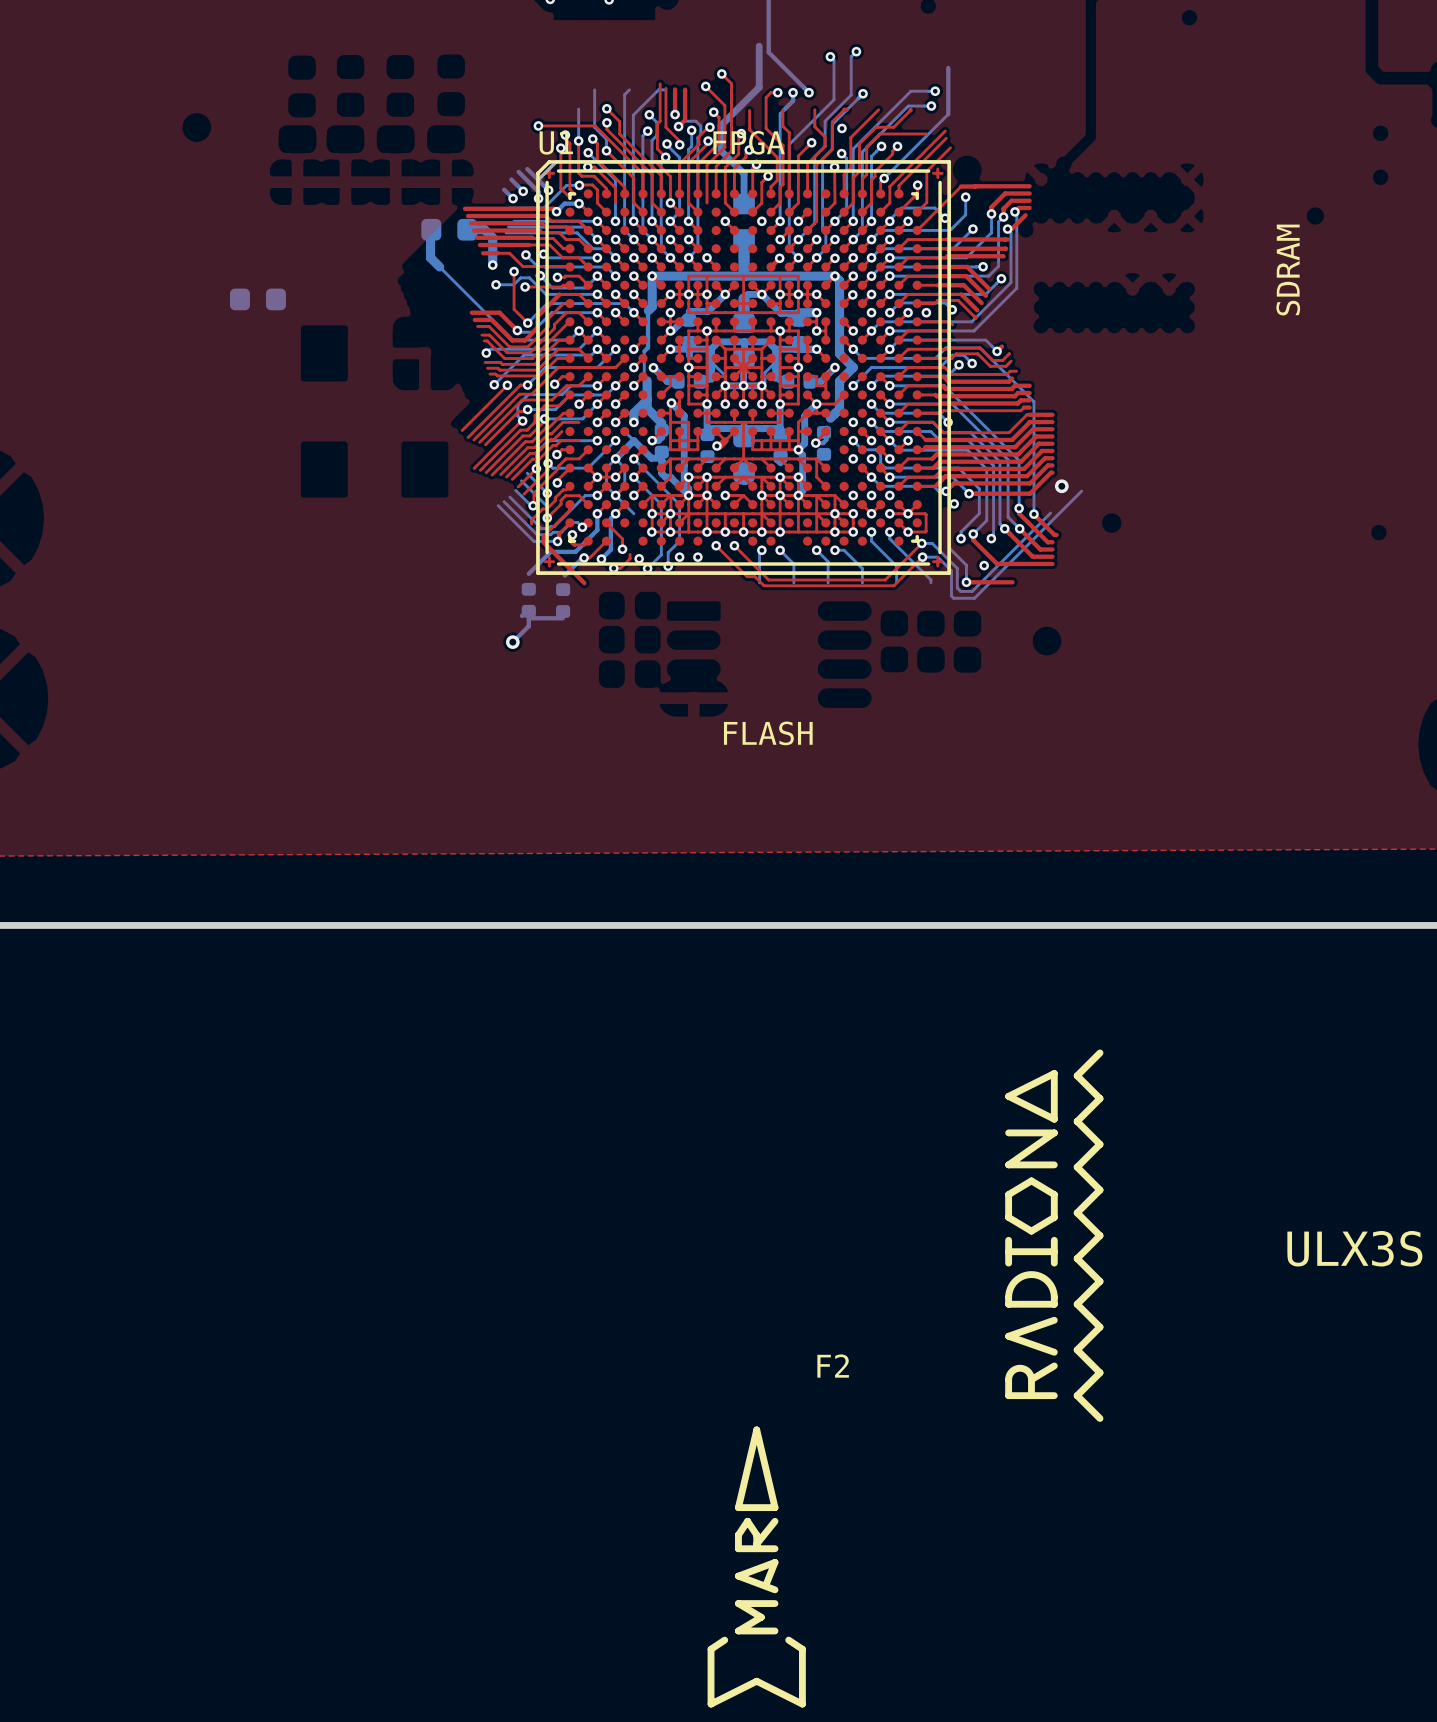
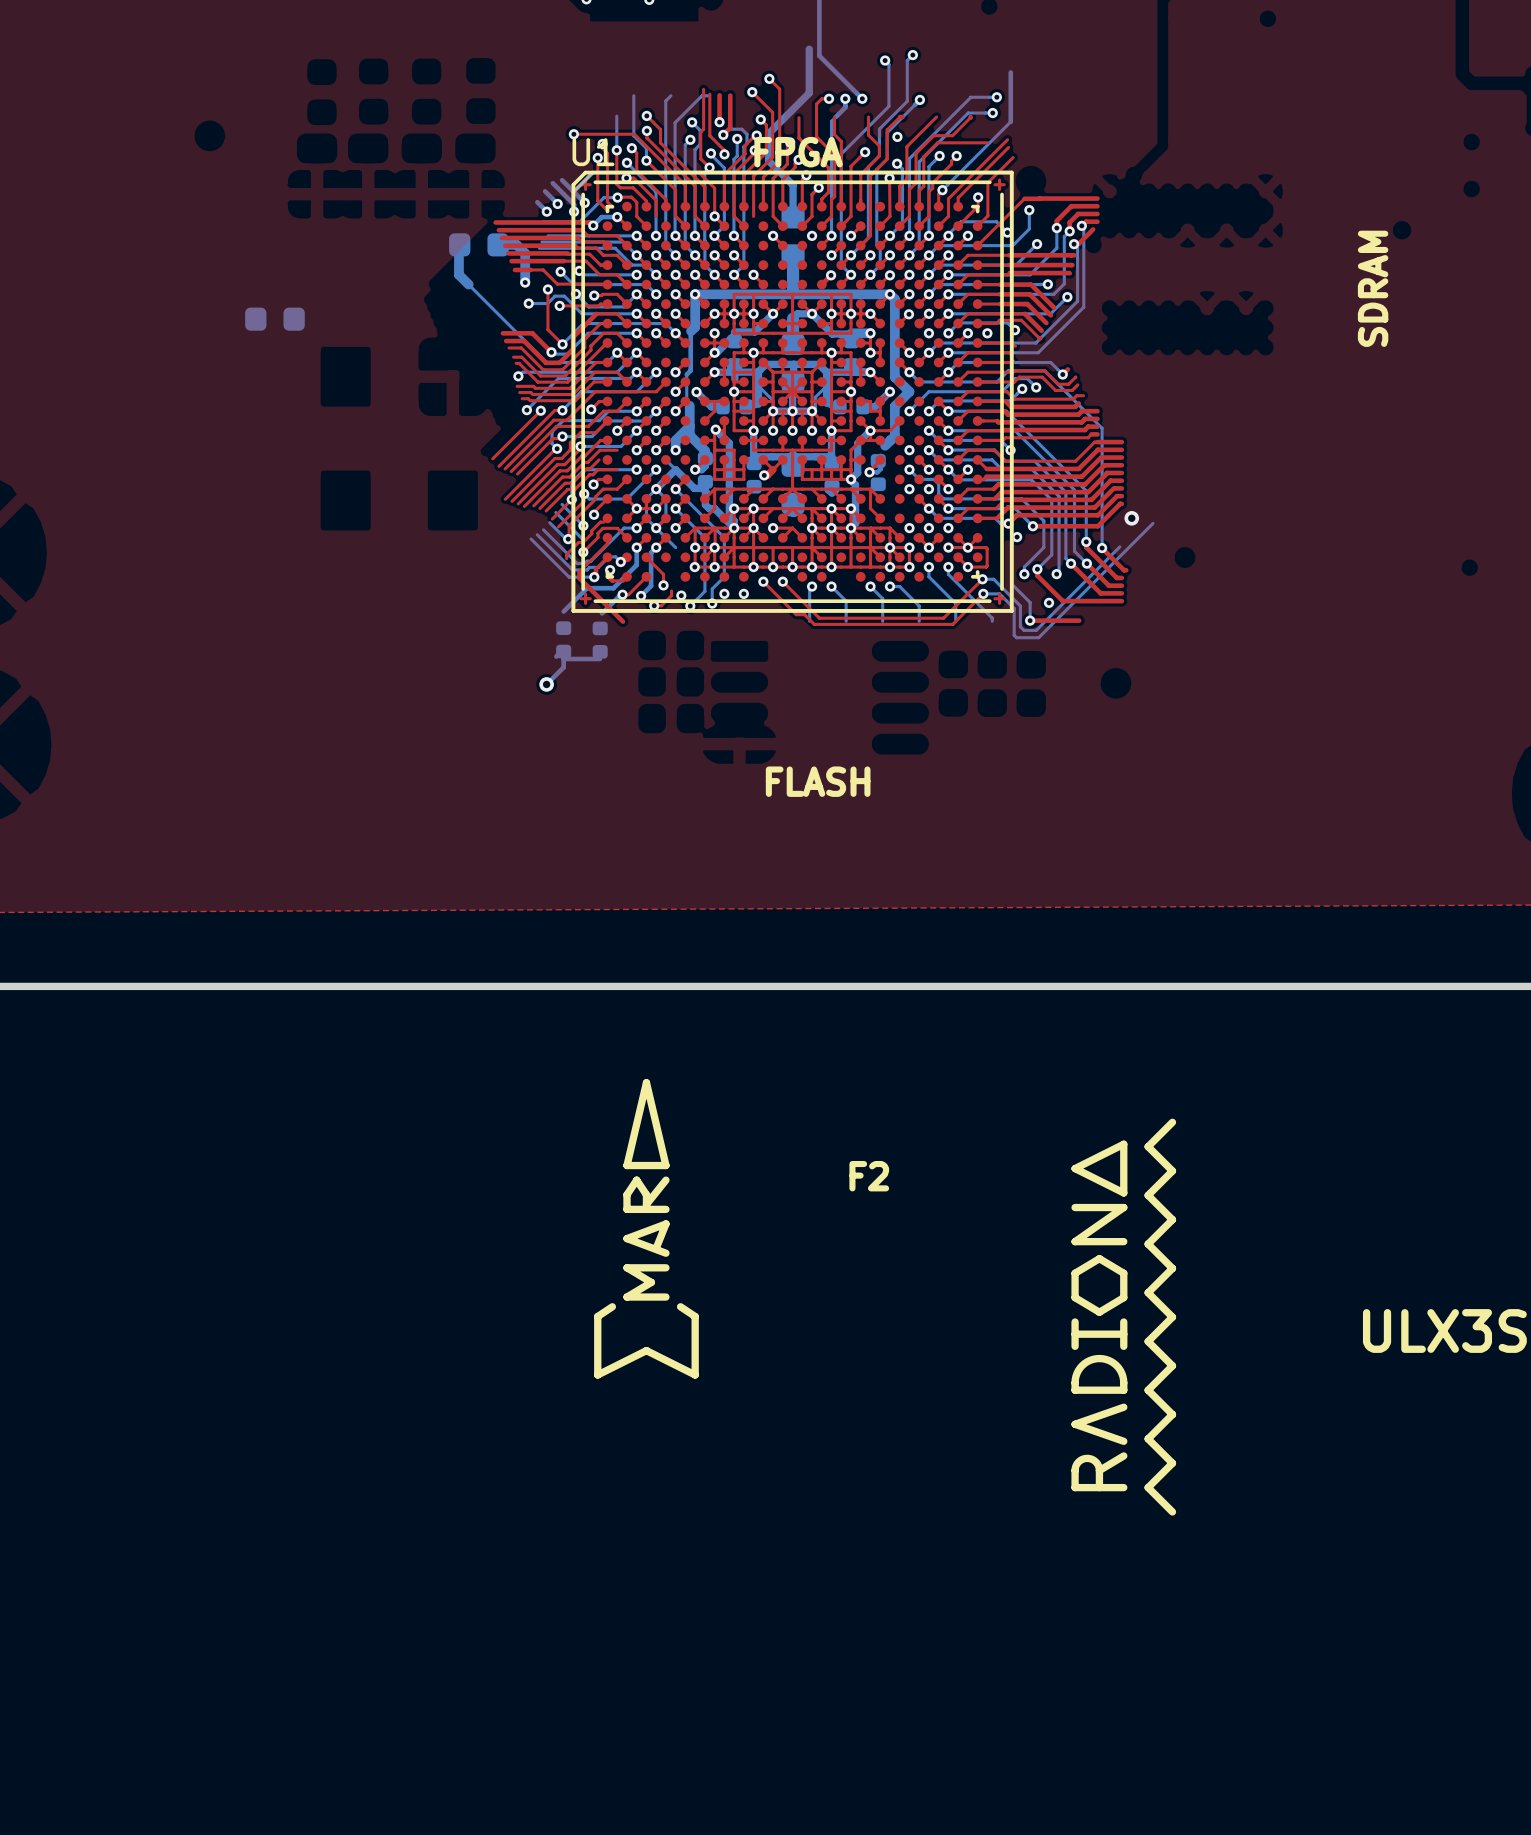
text position: F2 (833, 1366) -> F2 (869, 1176)
drawing position: (756, 1567) -> (646, 1228)

